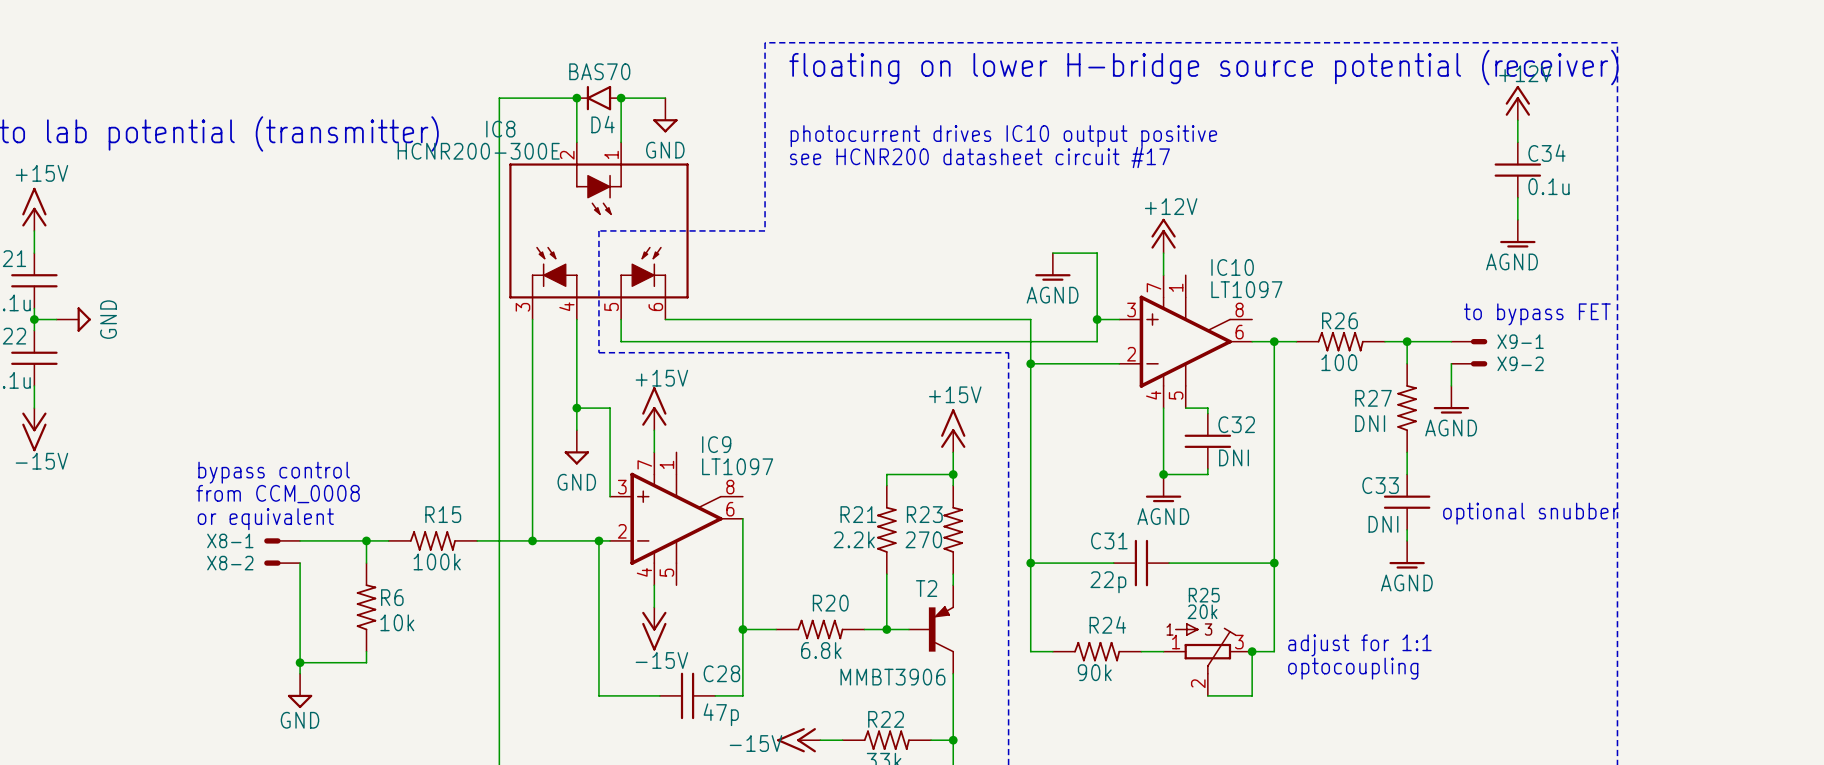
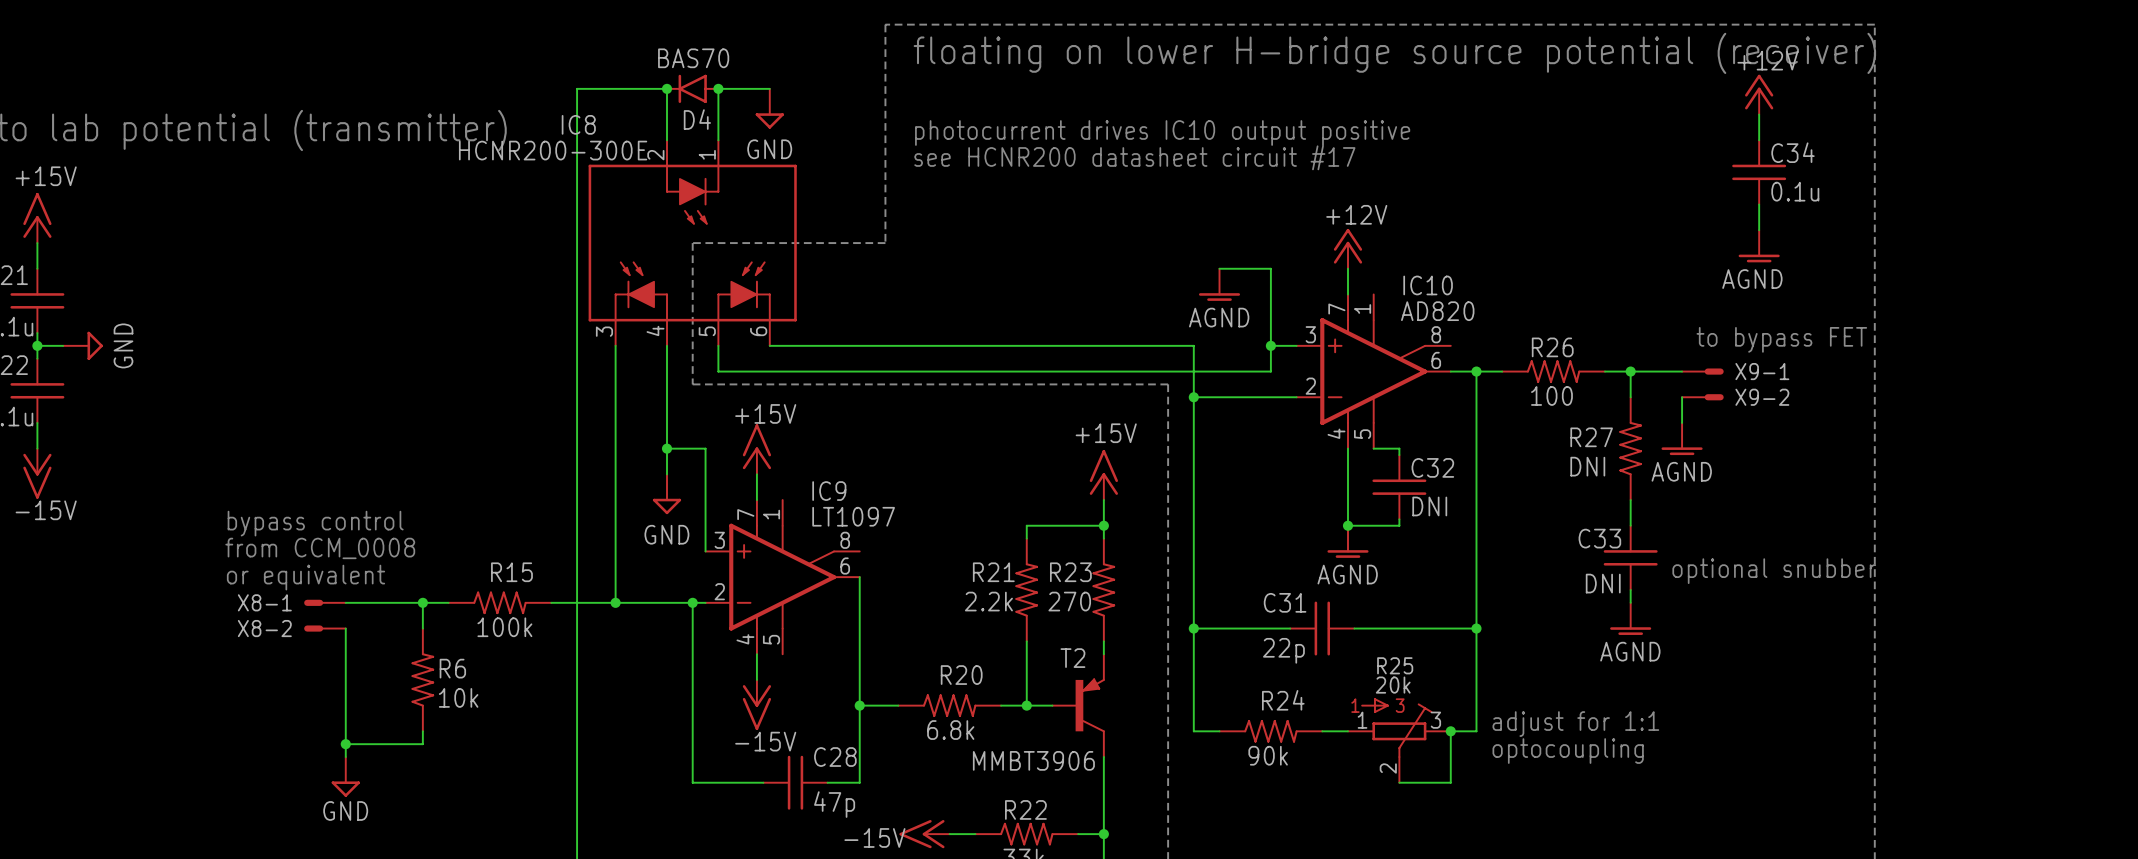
IC10 value: LT1097 (1246, 289) -> AD820 (1437, 311)

